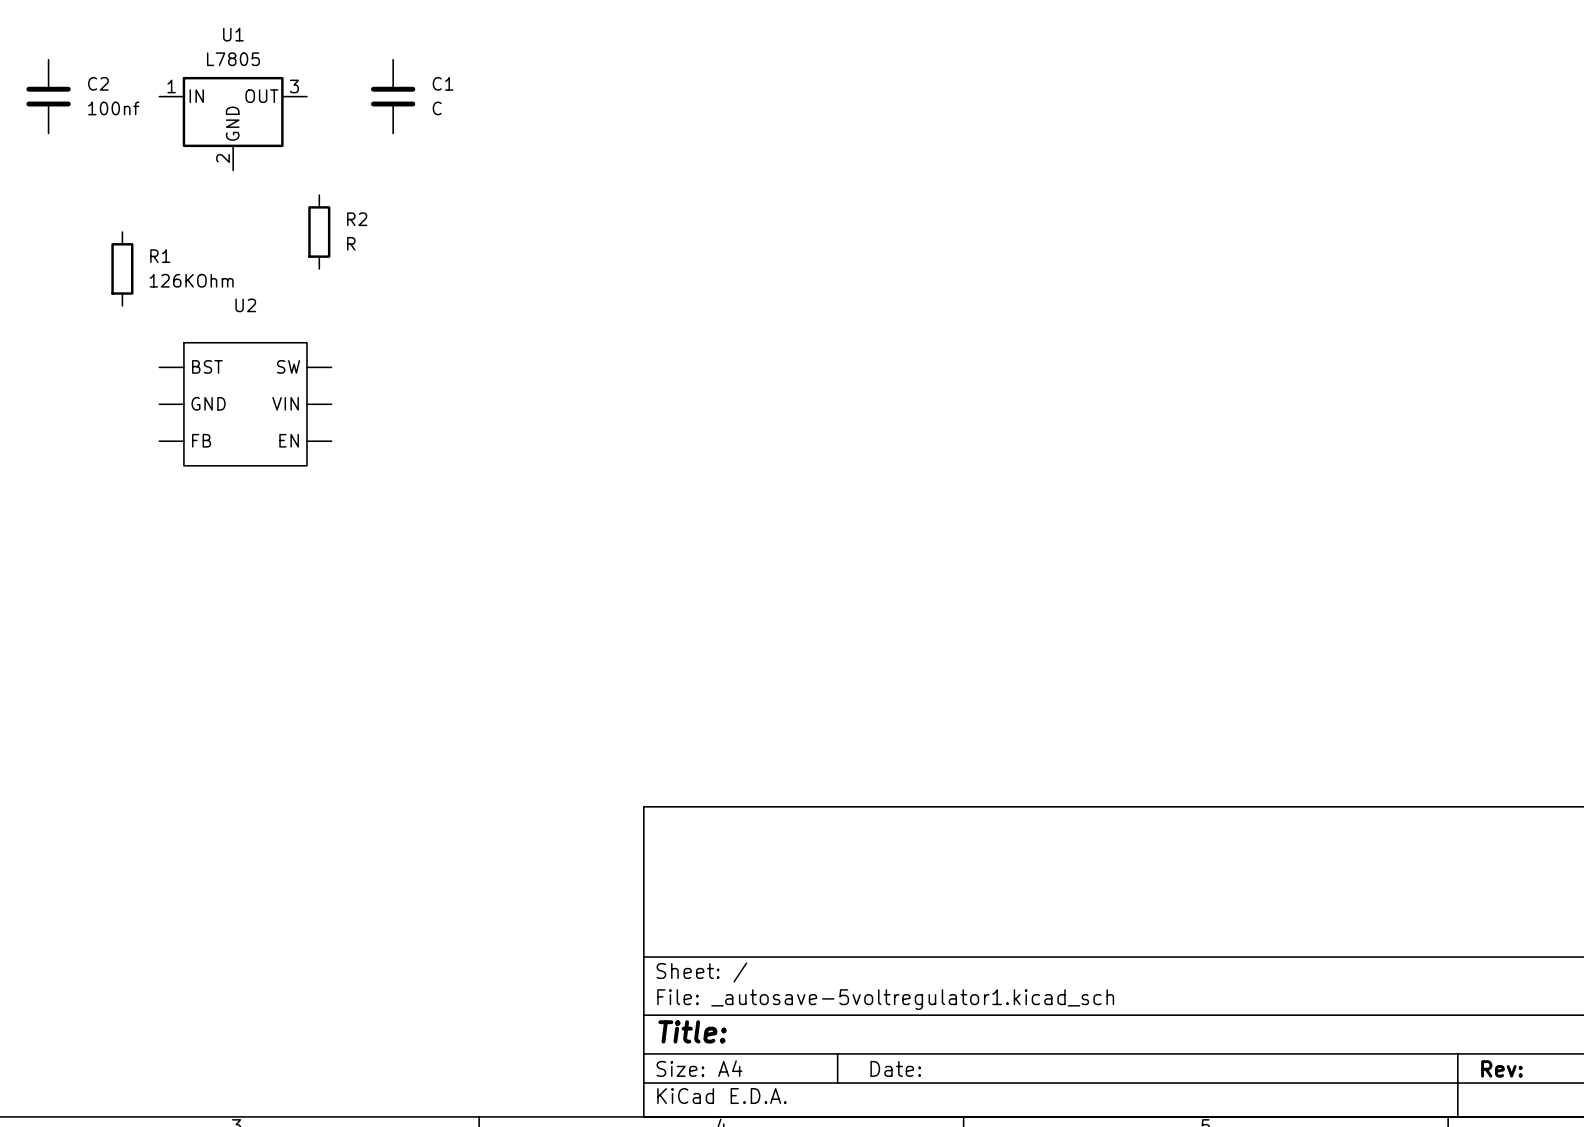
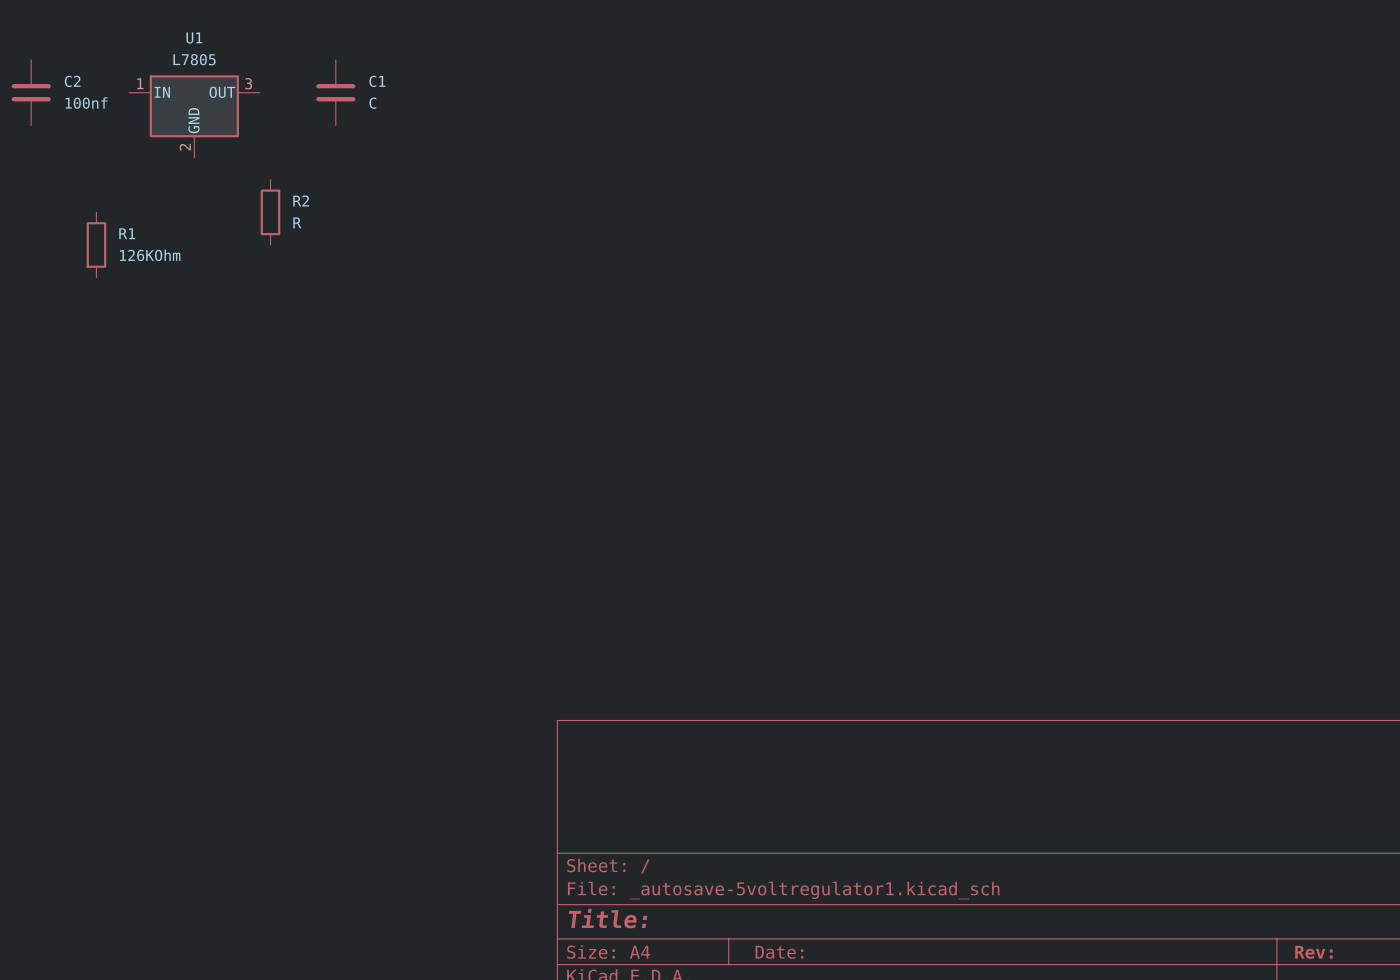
U2: (245, 404) -> none

